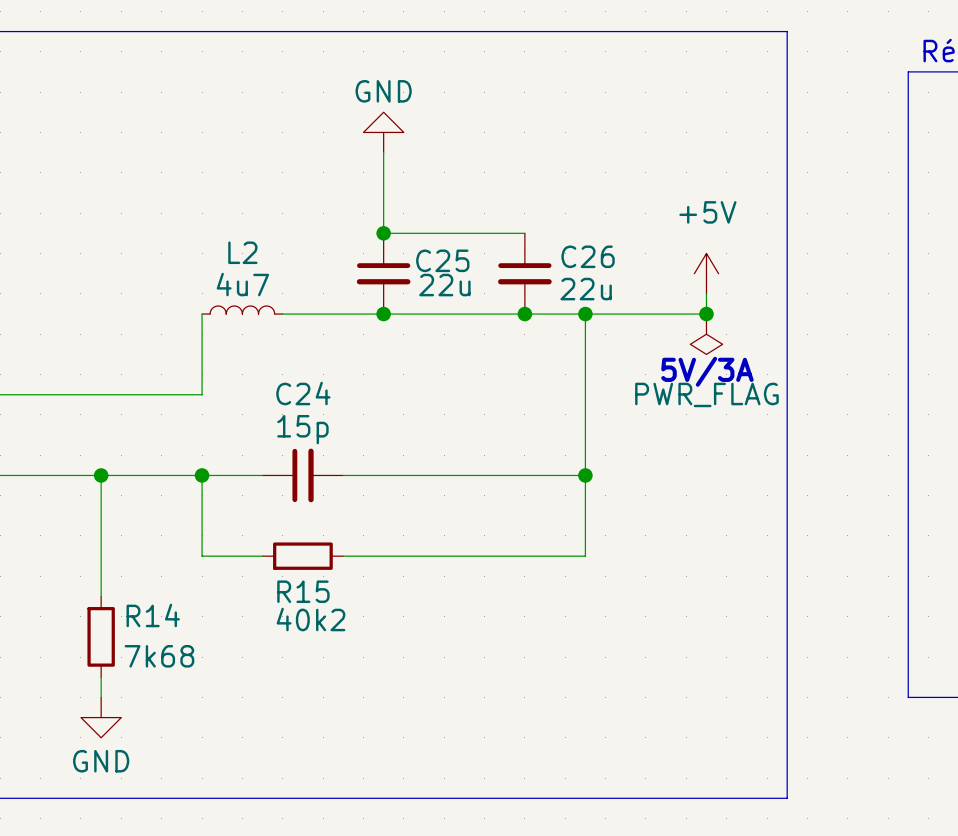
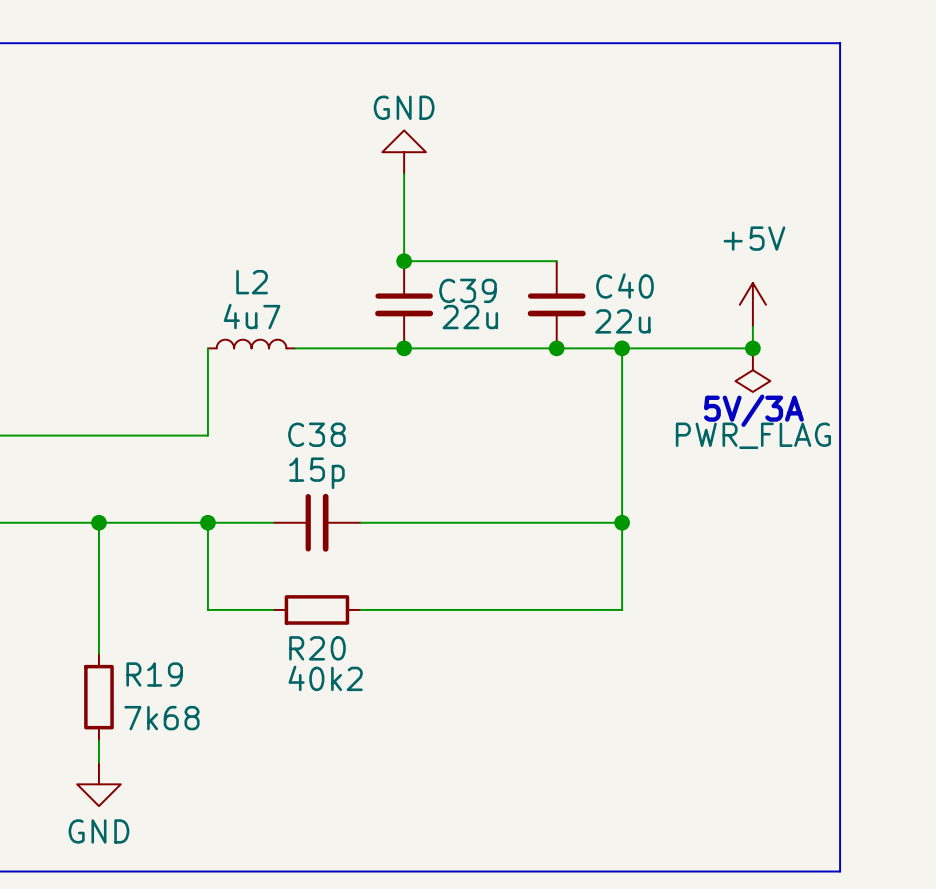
C26 name: C26 (588, 256) -> C40 (624, 286)
C25 name: C25 (442, 260) -> C39 (468, 290)
C24 name: C24 (303, 393) -> C38 (316, 434)
R15 name: R15 (303, 591) -> R20 (317, 648)
R14 name: R14 (153, 615) -> R19 (154, 674)

